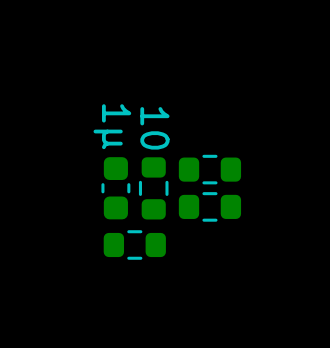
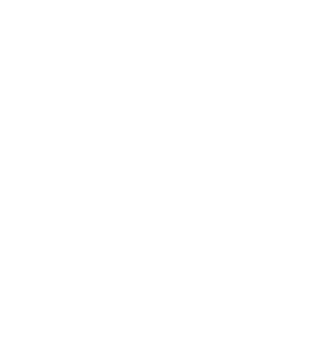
part: (209, 169) -> none
part: 1μ (115, 188) -> none
part: 10 (153, 188) -> none
part: (209, 206) -> none
part: (134, 244) -> none

